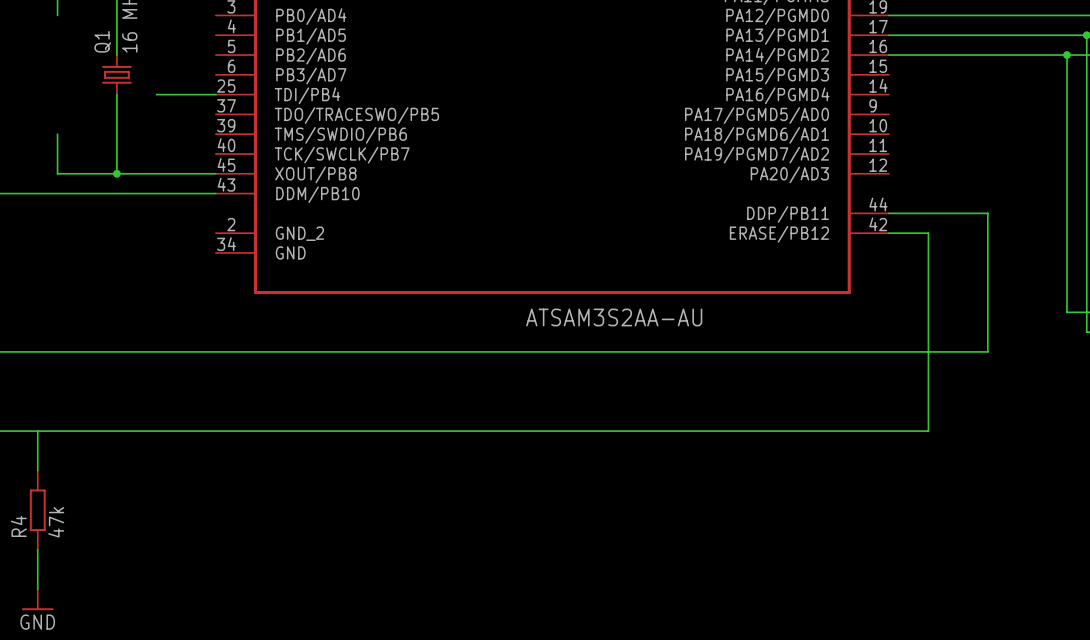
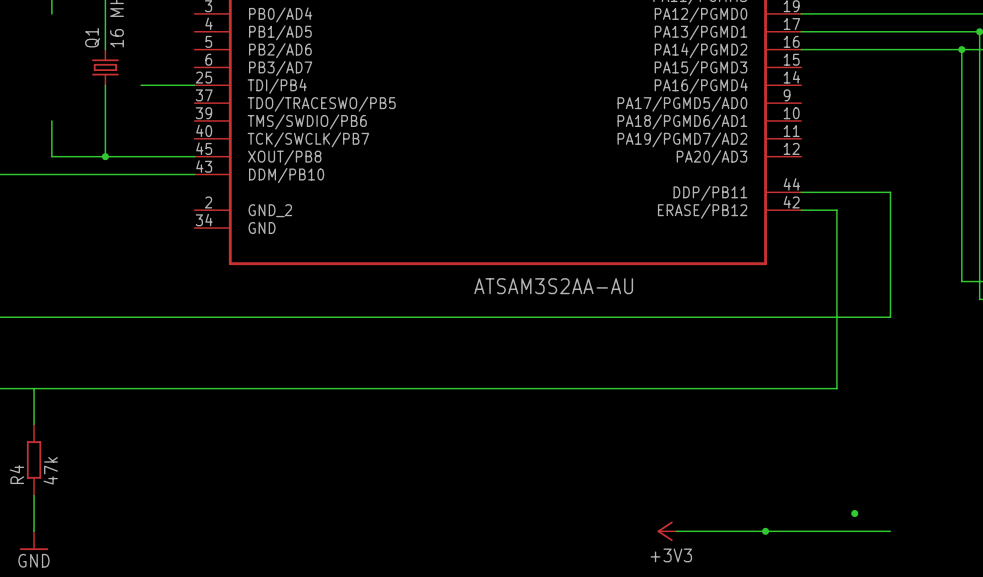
junction: none -> (854, 513)
power symbol: none -> +3V3 (666, 531)
wire: none -> (676, 531) (890, 531)
junction: none -> (765, 531)

